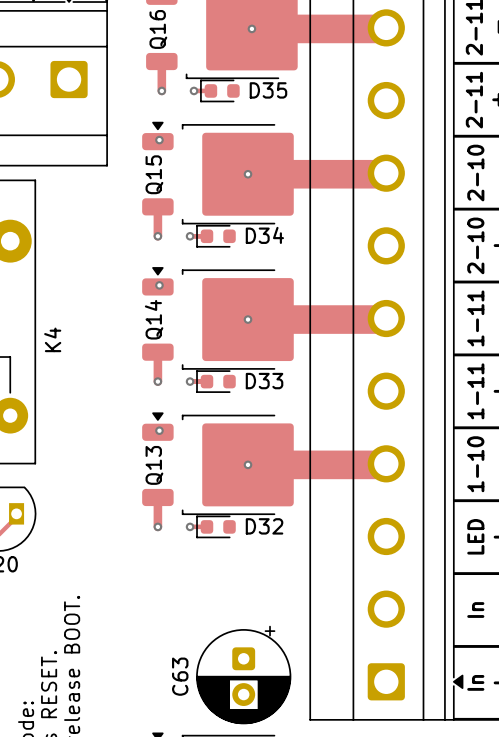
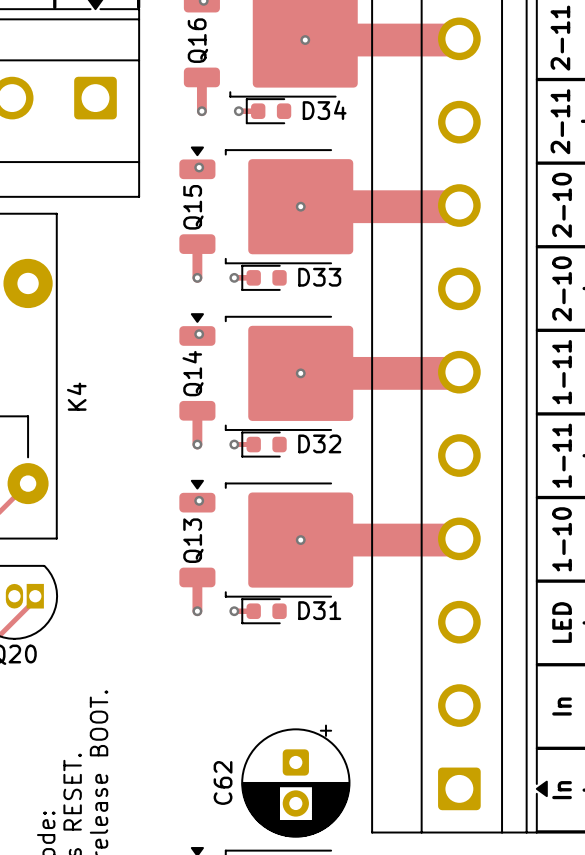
D35 name: D35 (268, 90) -> D34 (324, 110)
D34 name: D34 (264, 235) -> D33 (319, 277)
D33 name: D33 (264, 381) -> D32 (319, 443)
D32 name: D32 (264, 526) -> D31 (319, 610)
C63 name: C63 (180, 676) -> C62 (223, 782)

